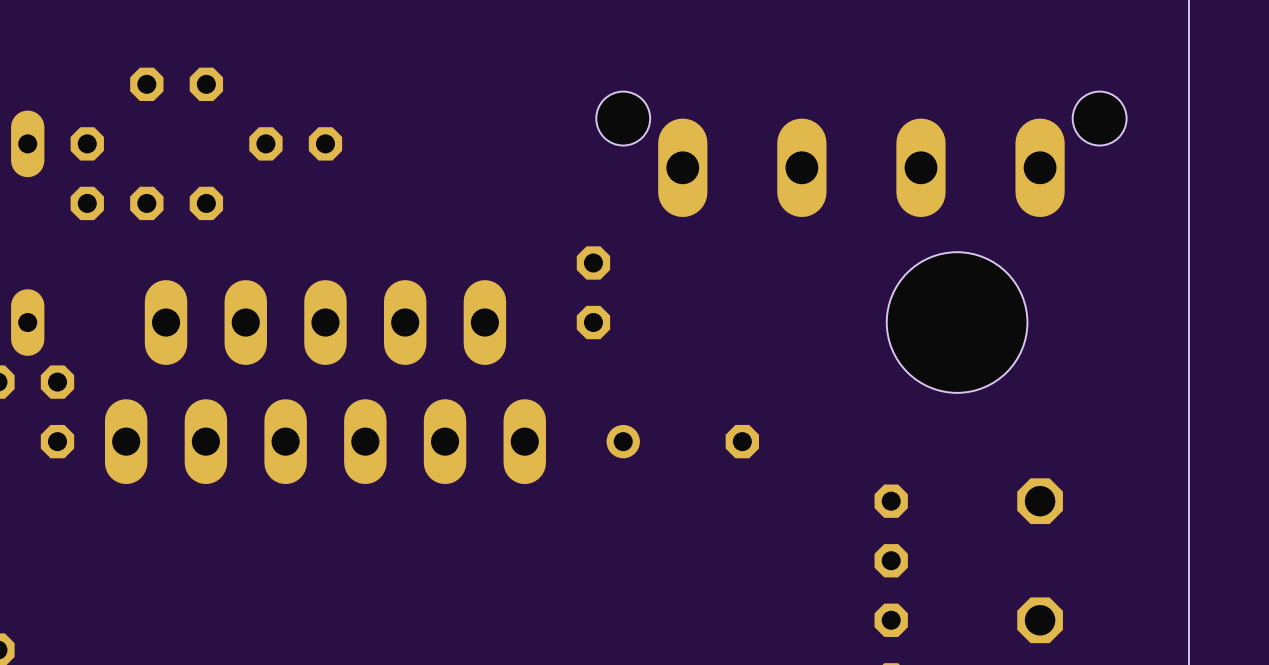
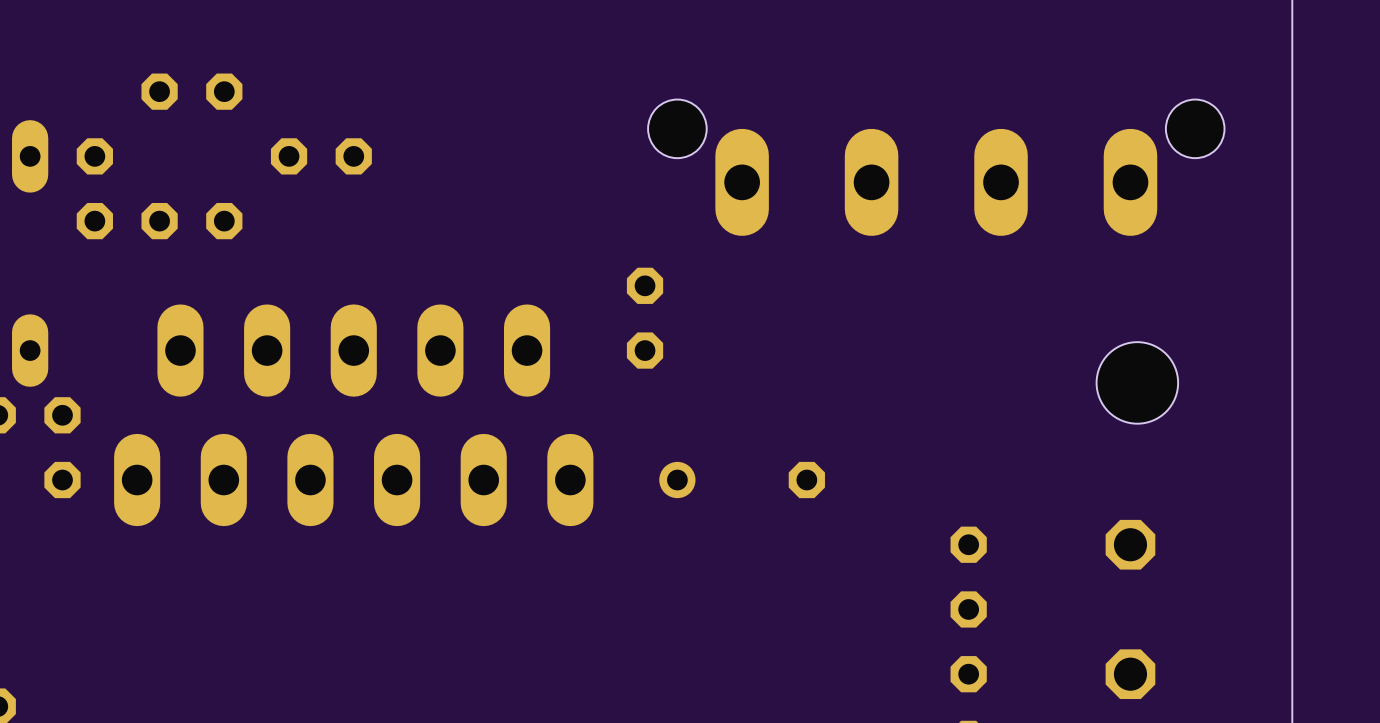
hole: (957, 322) -> none
hole: none -> (1137, 382)

